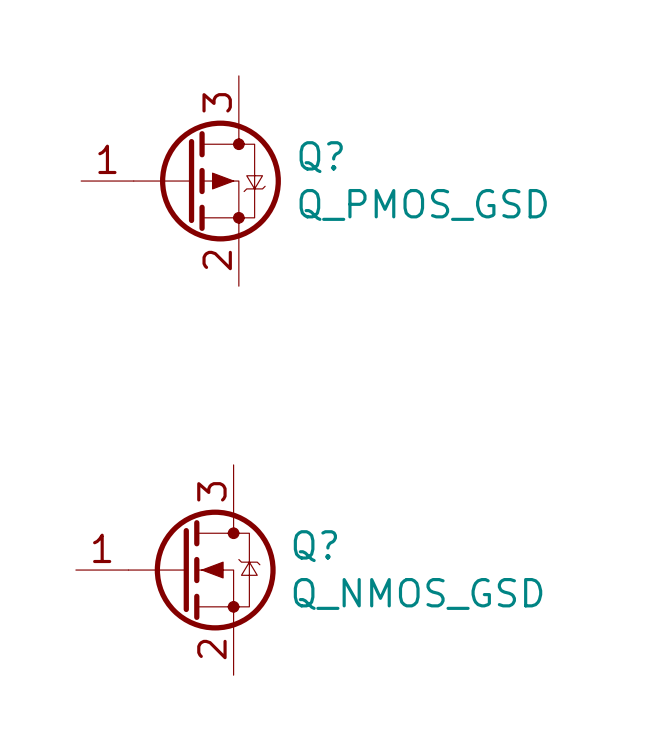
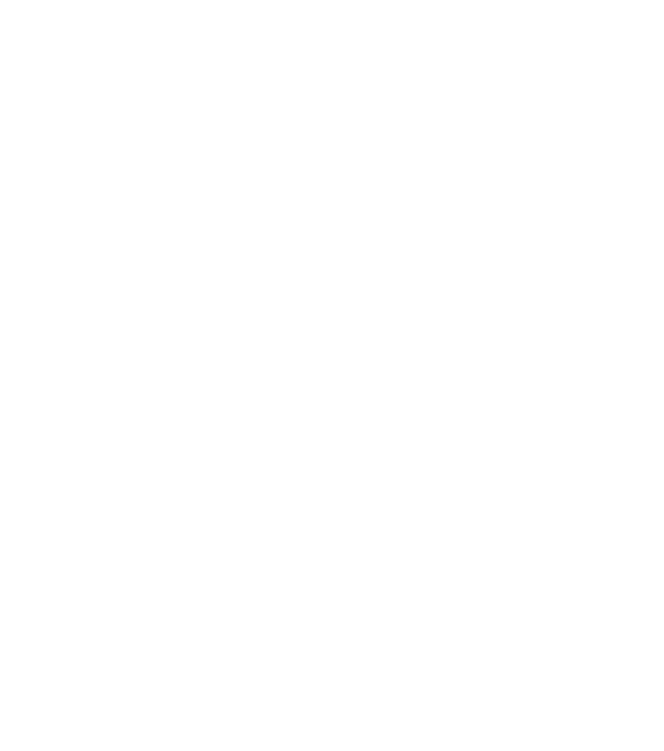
Q?: Q_PMOS_GSD (181, 181) -> none
Q?: Q_NMOS_GSD (175, 570) -> none

